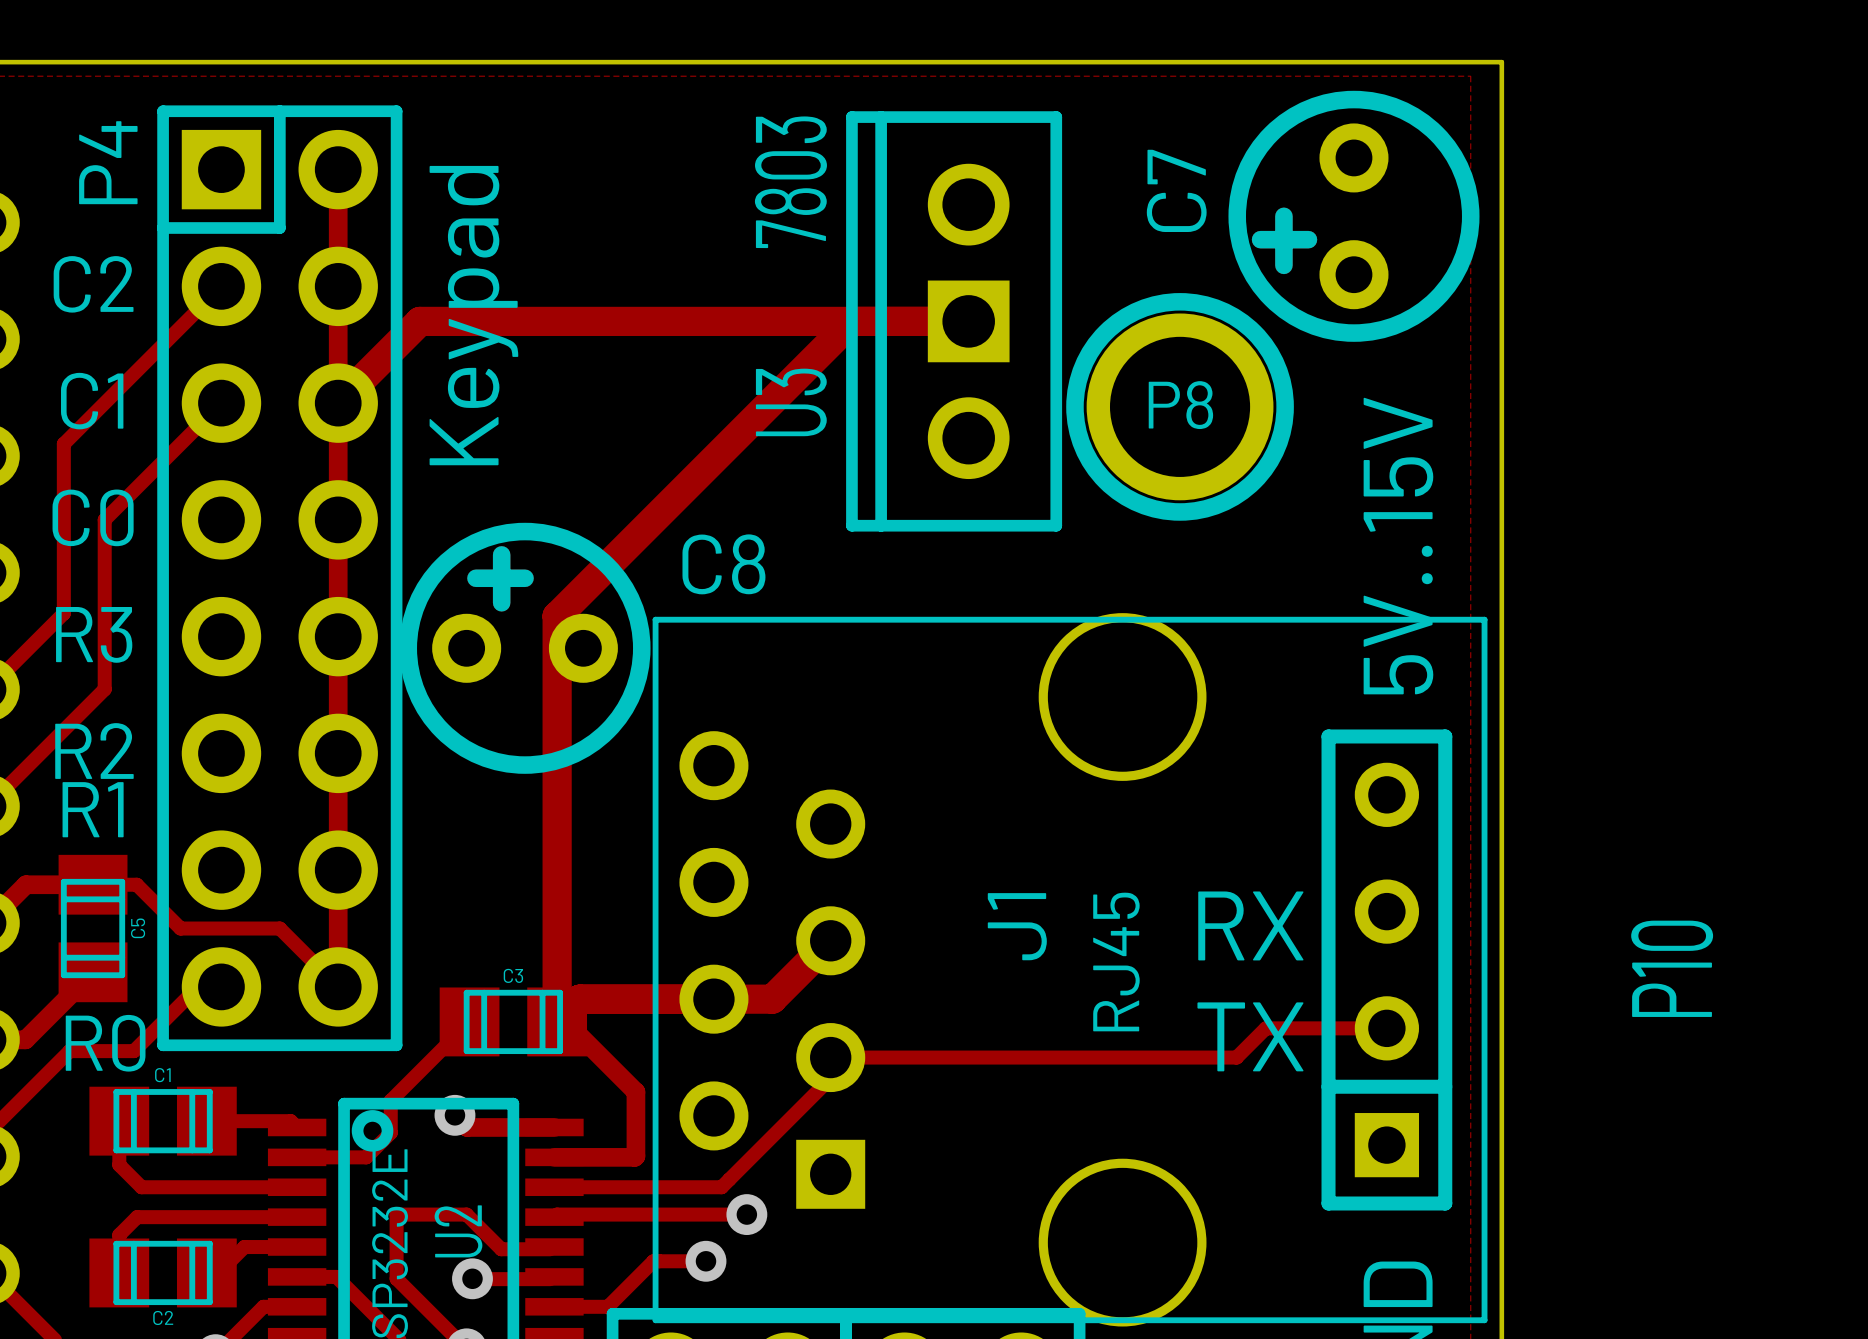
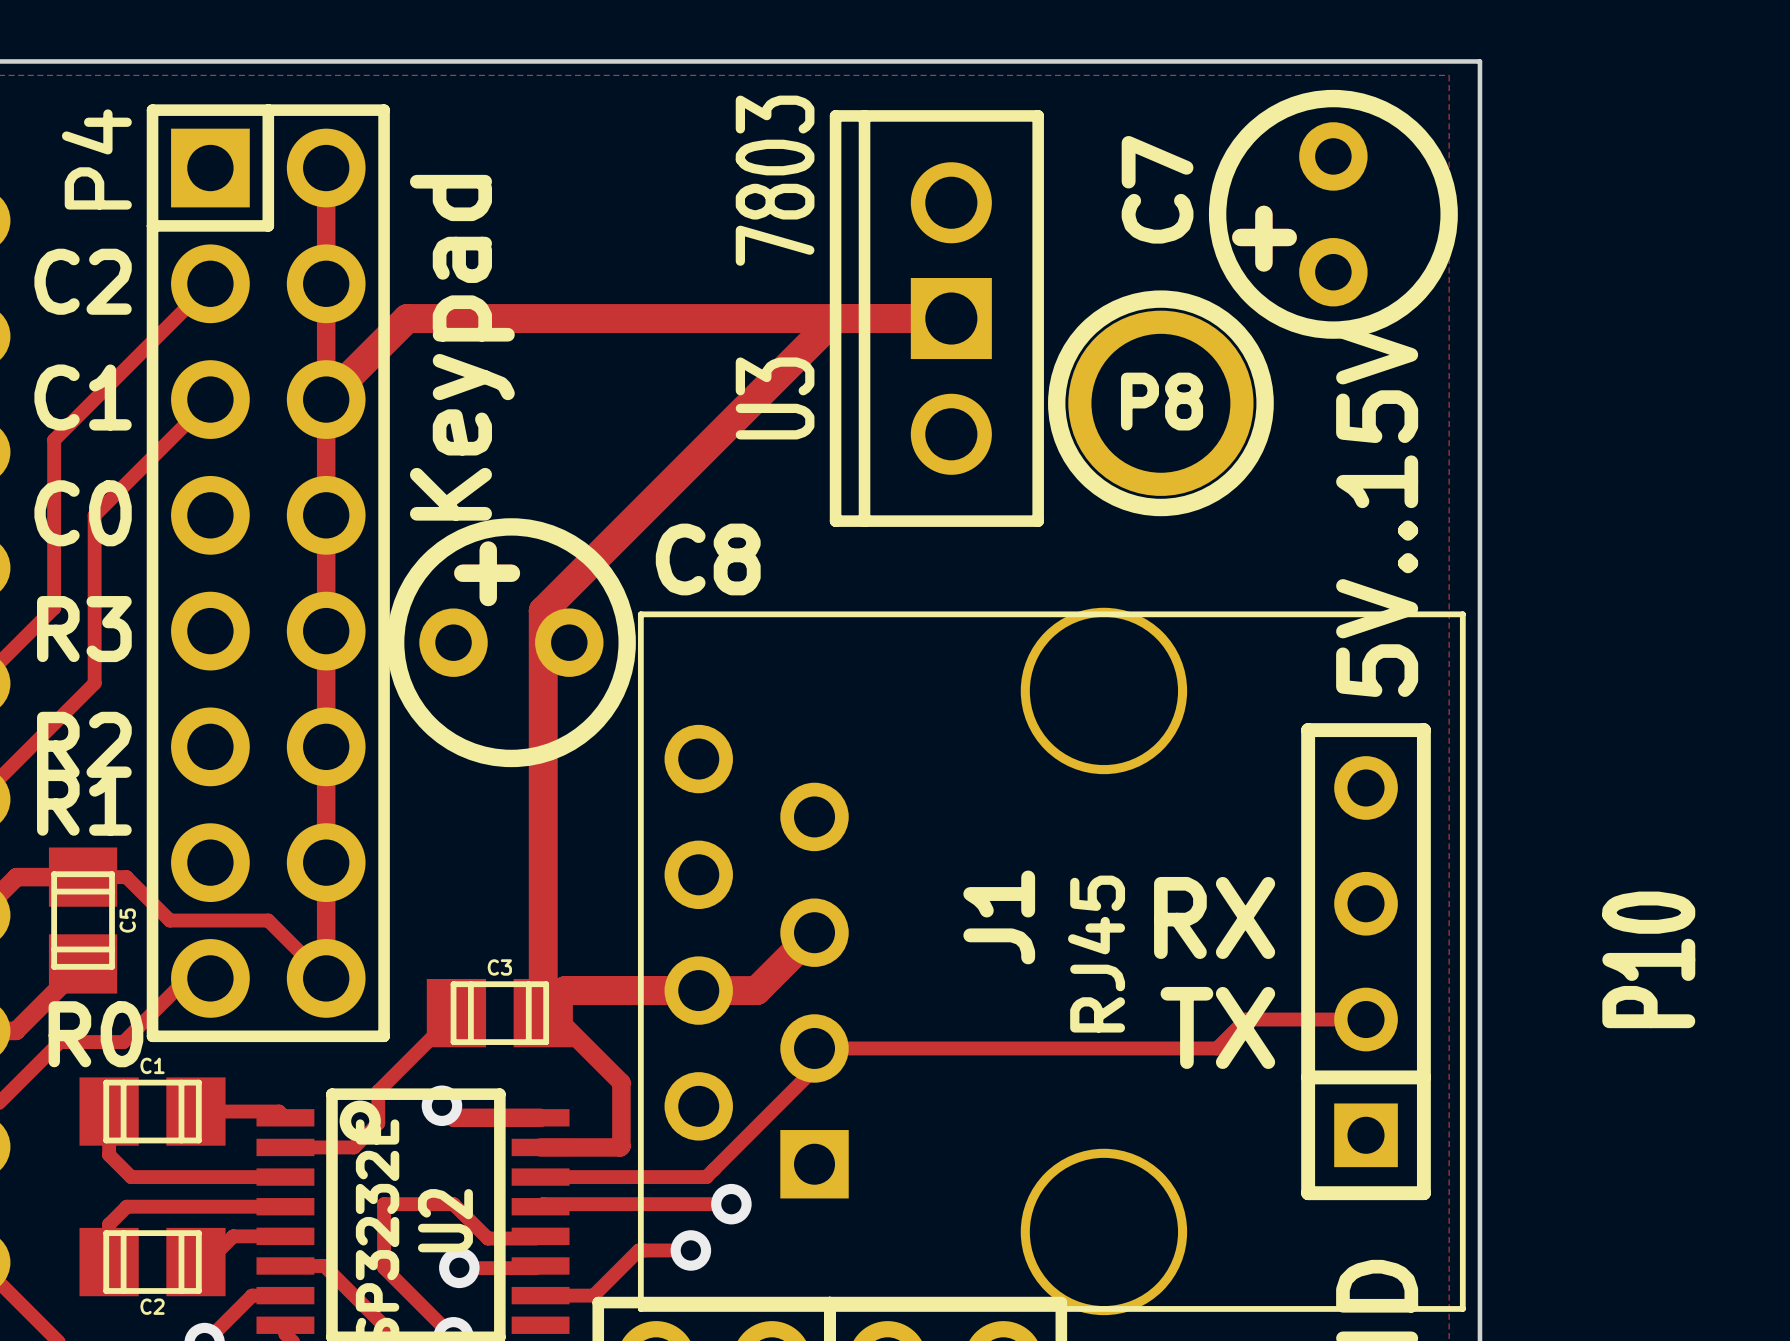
text position: 5V..15V (1398, 545) -> 5V..15V (1377, 511)

